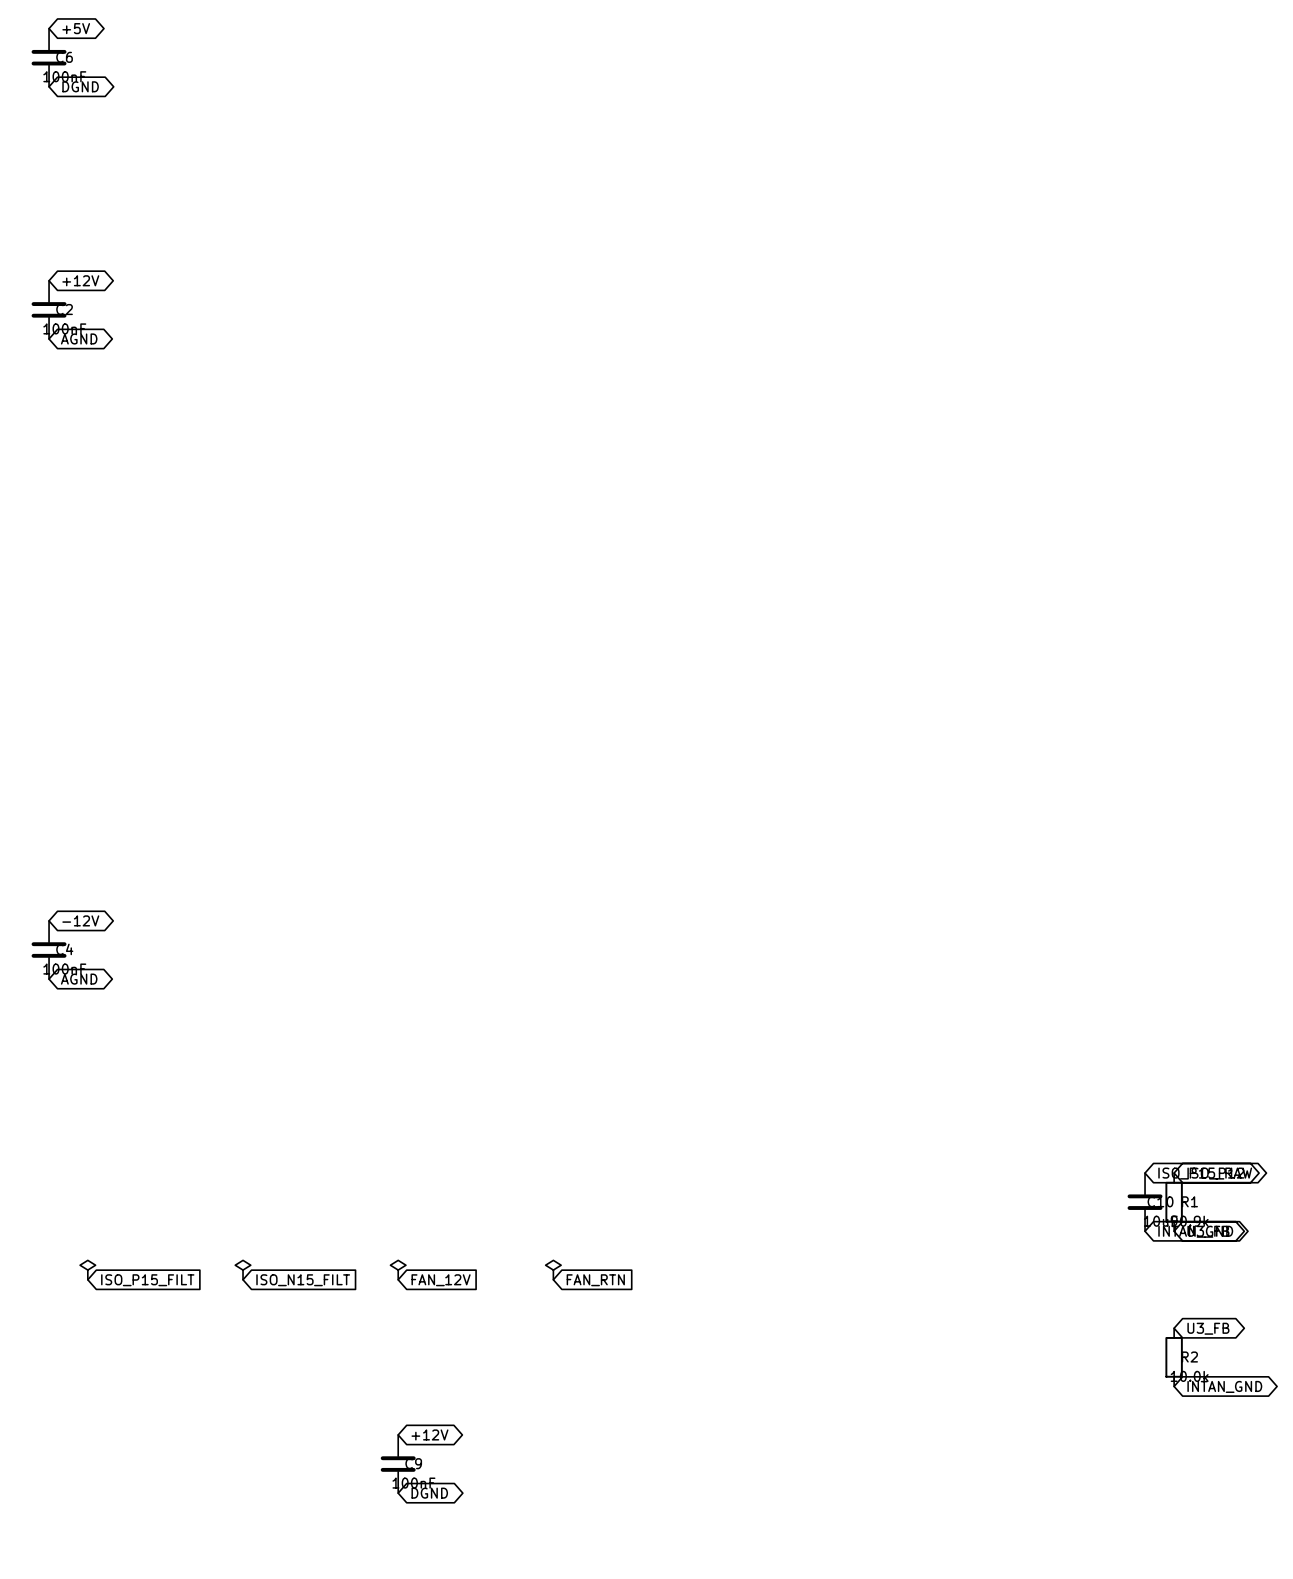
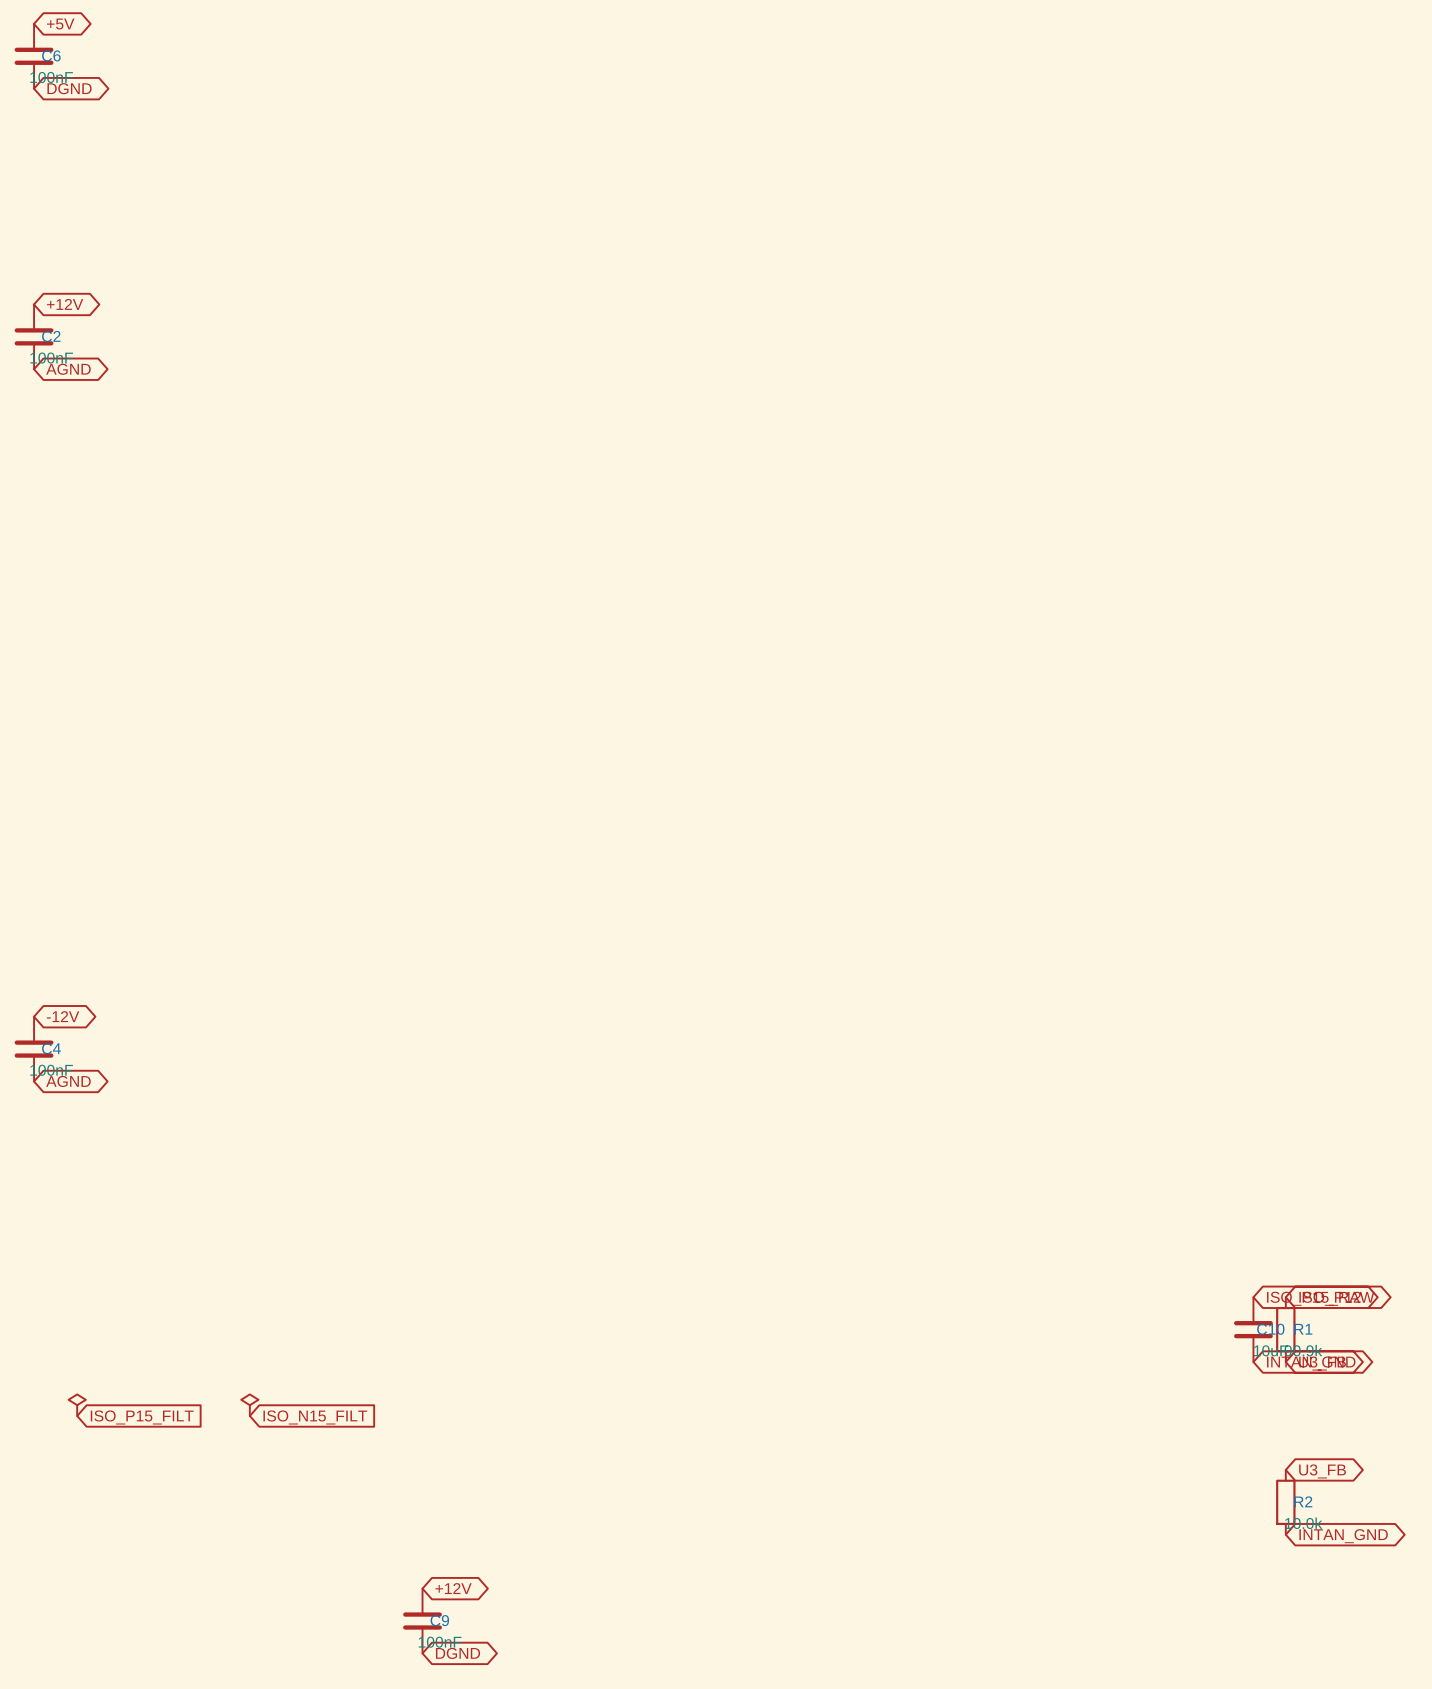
power symbol: (398, 1270) -> none
power symbol: (553, 1270) -> none
global label: FAN_12V (441, 1280) -> none
global label: FAN_RTN (595, 1280) -> none

